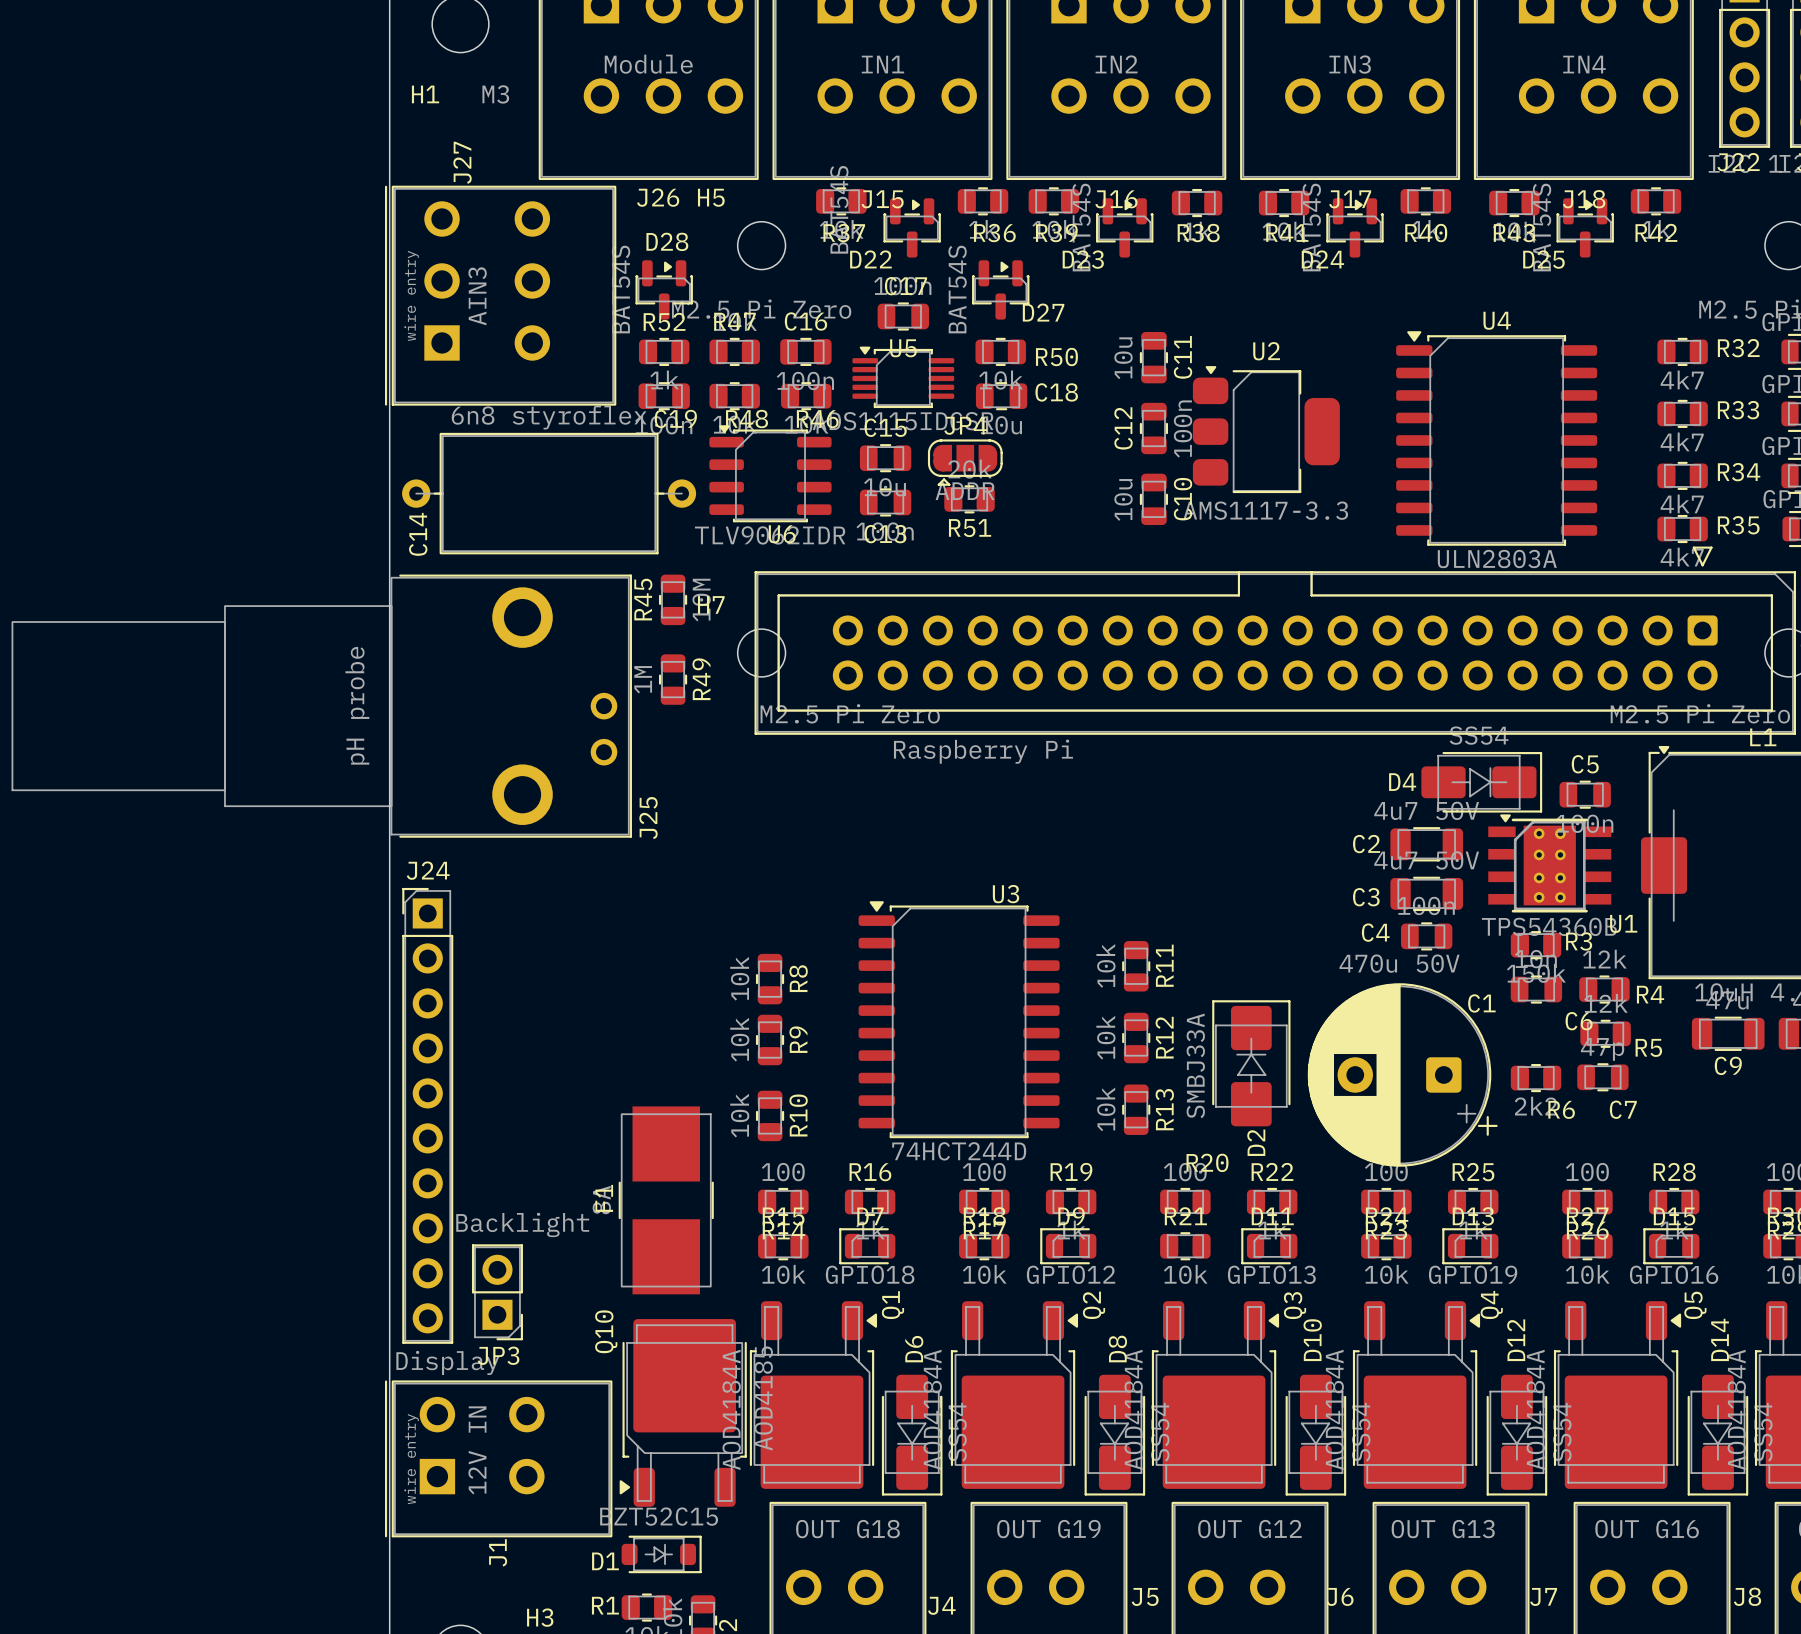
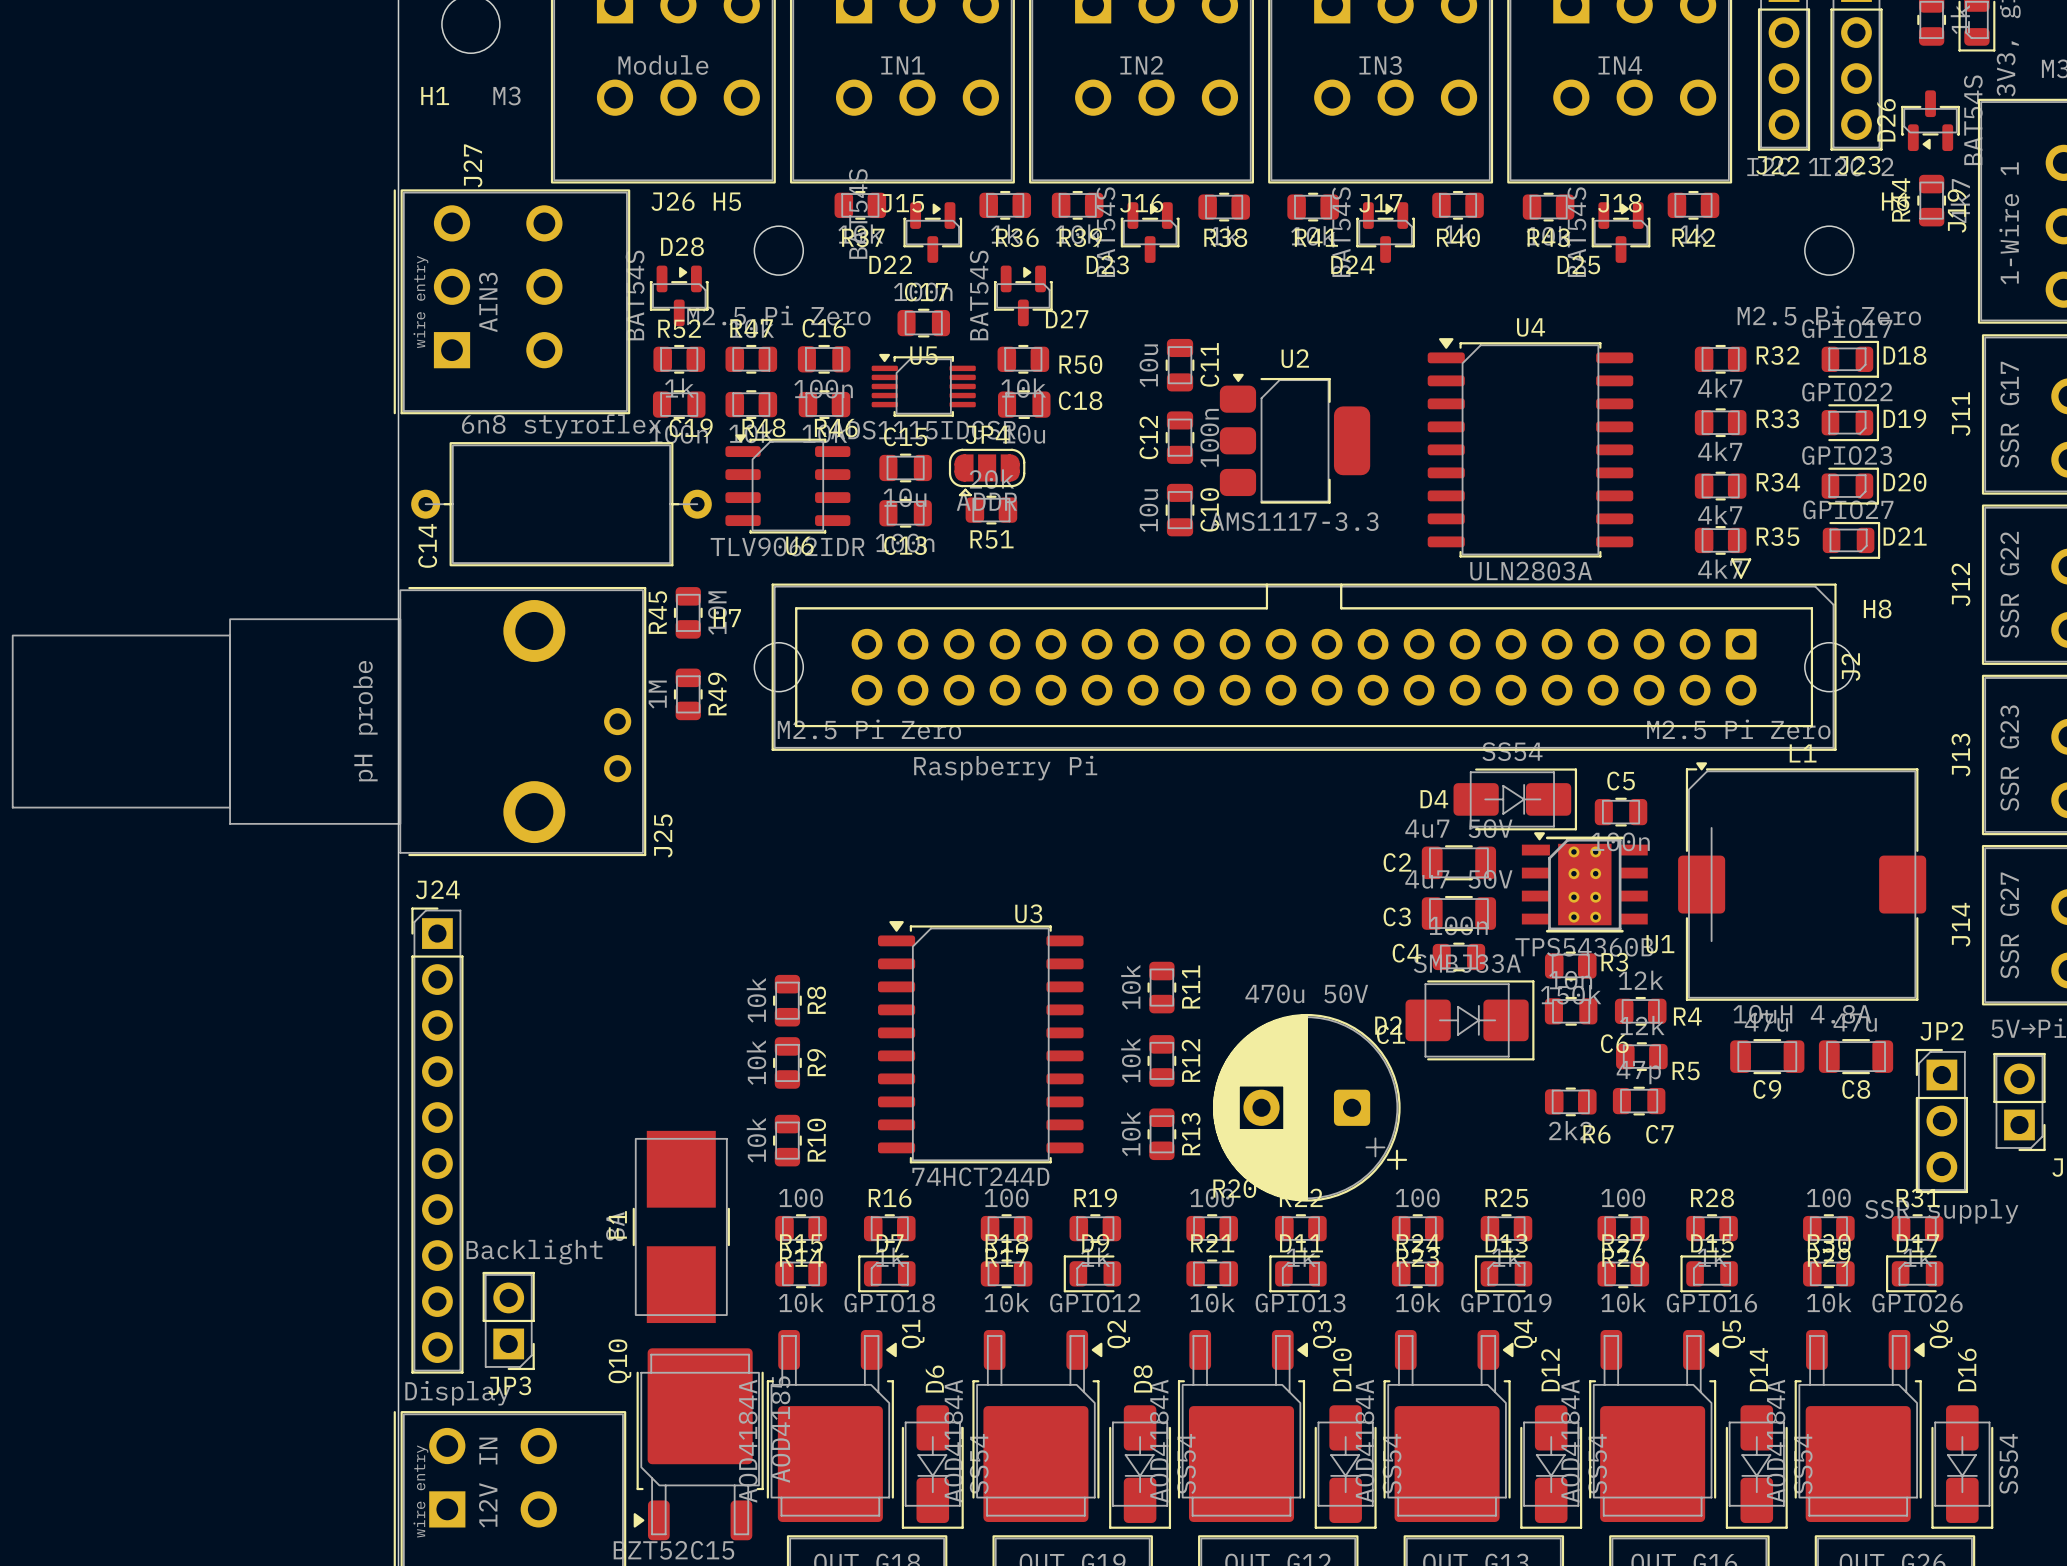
D2 rotation: 0° (1251, 1063) -> 90° clockwise (1469, 1020)
D2 position: (1251, 1063) -> (1469, 1020)
C1 position: (1402, 1074) -> (1310, 1107)

